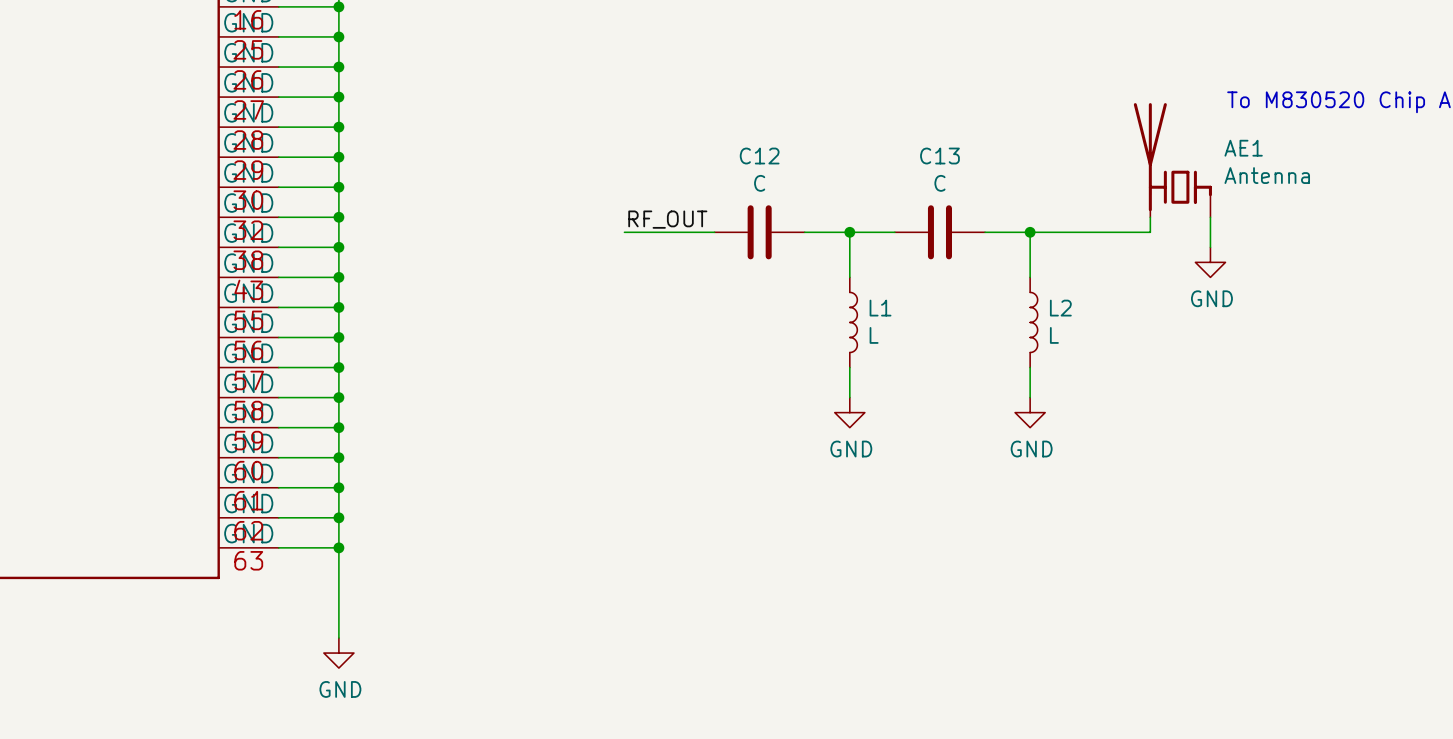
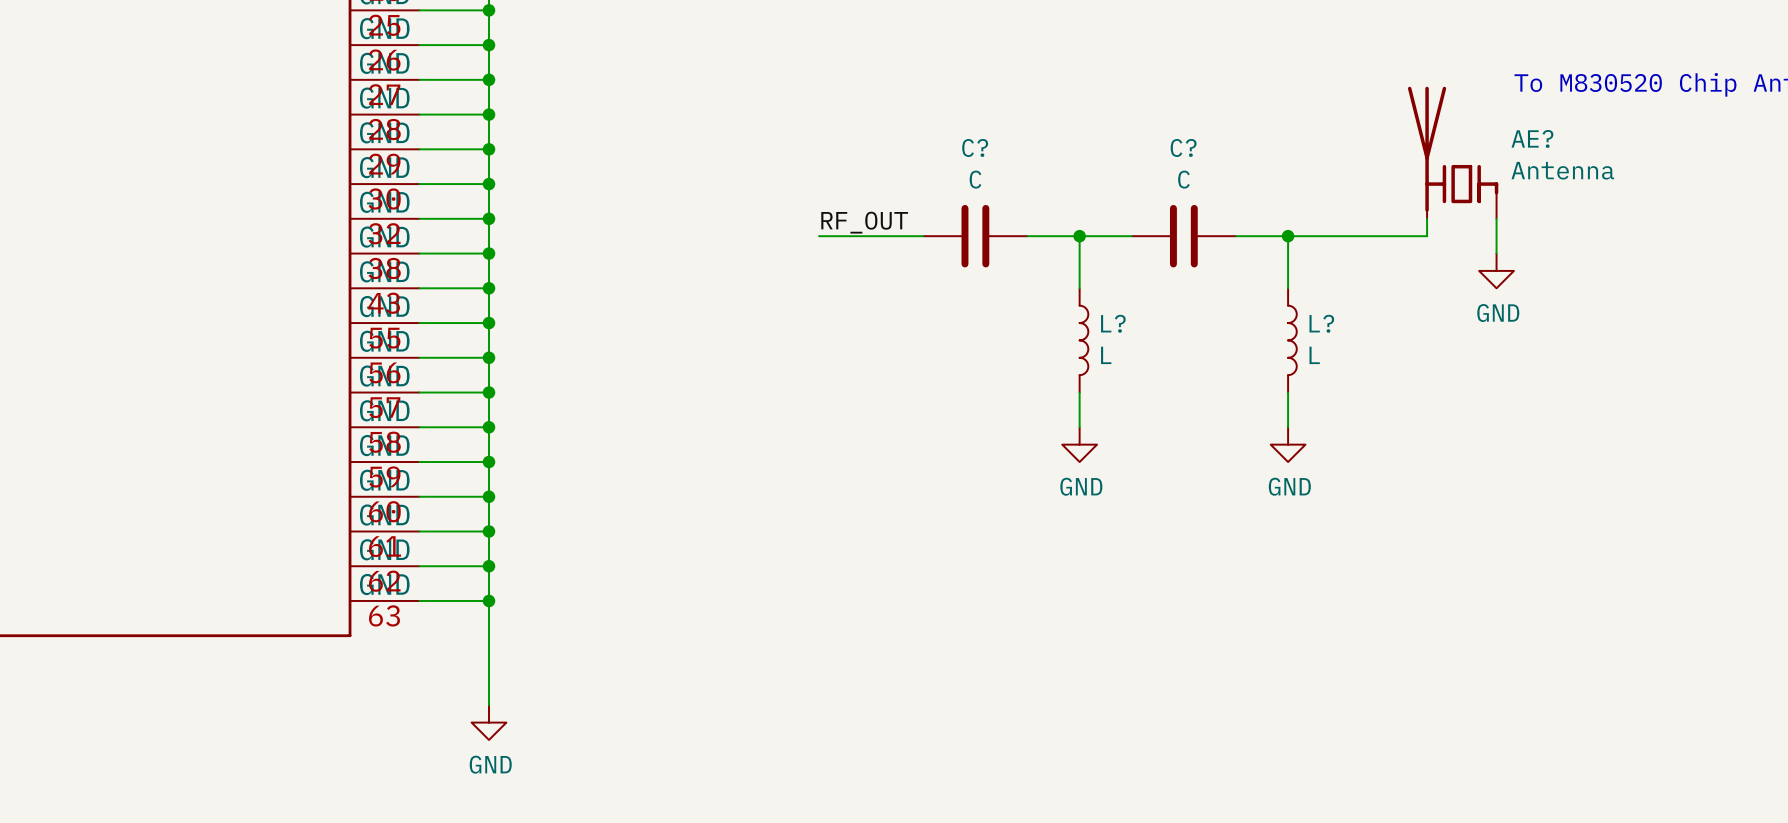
AE1 name: AE1 (1243, 148) -> AE? (1532, 138)
C12 name: C12 (759, 156) -> C? (975, 147)
C13 name: C13 (939, 156) -> C? (1183, 147)
L1 name: L1 (880, 308) -> L? (1113, 323)
L2 name: L2 (1060, 308) -> L? (1321, 323)

